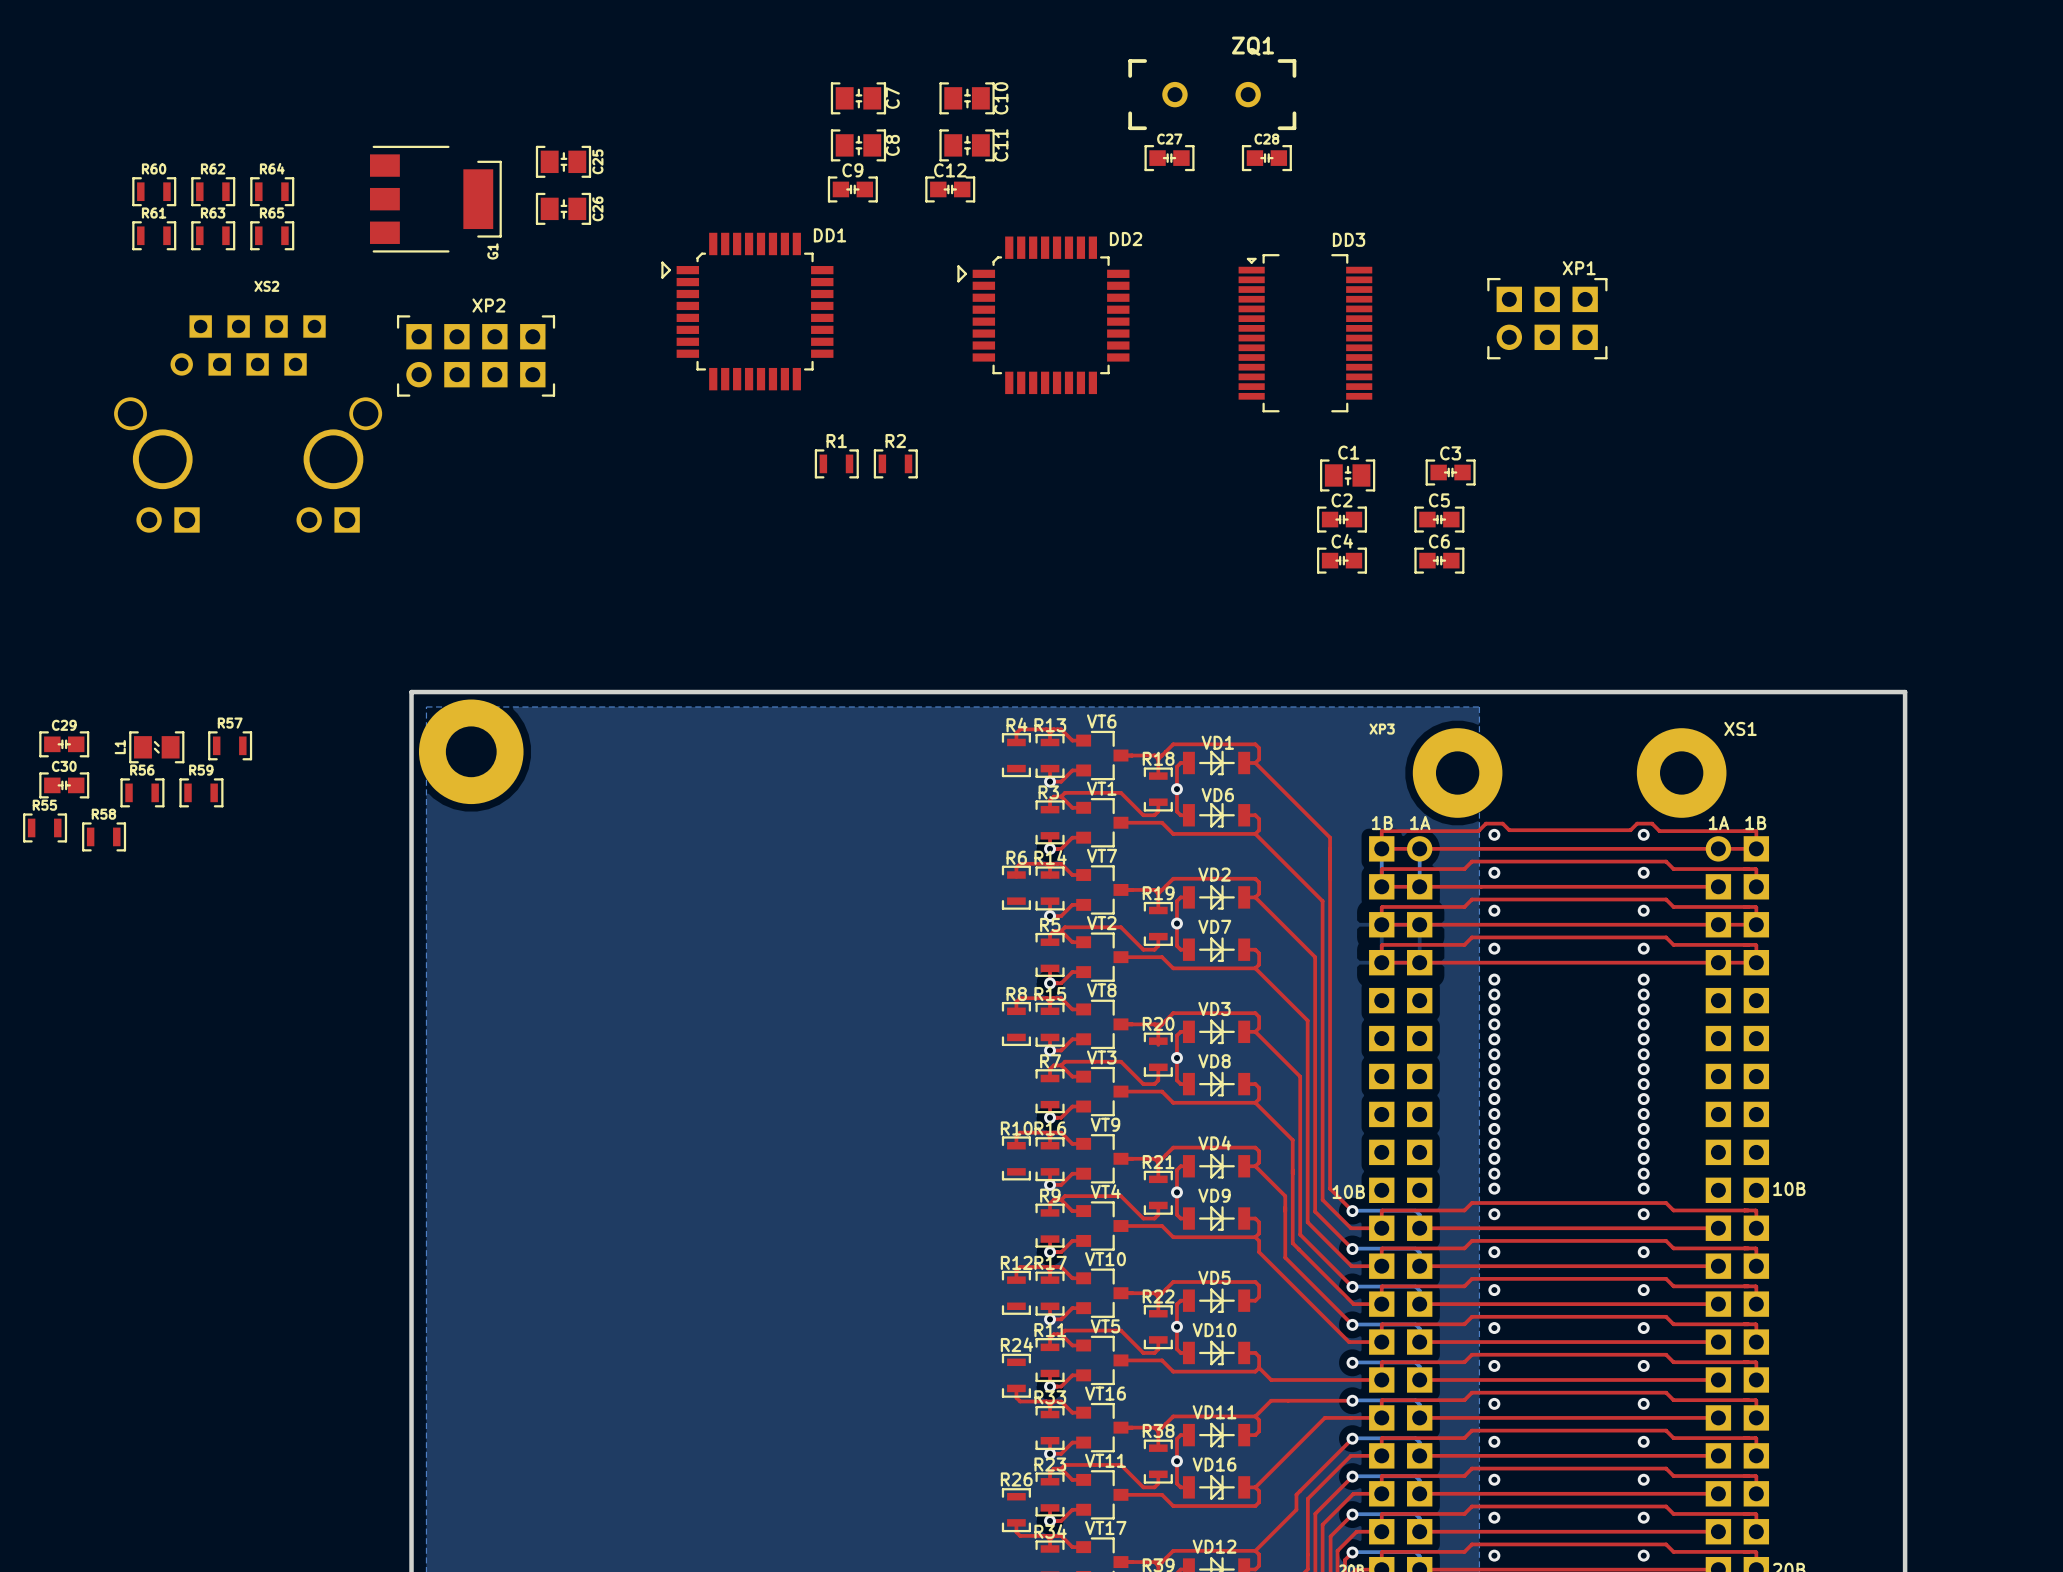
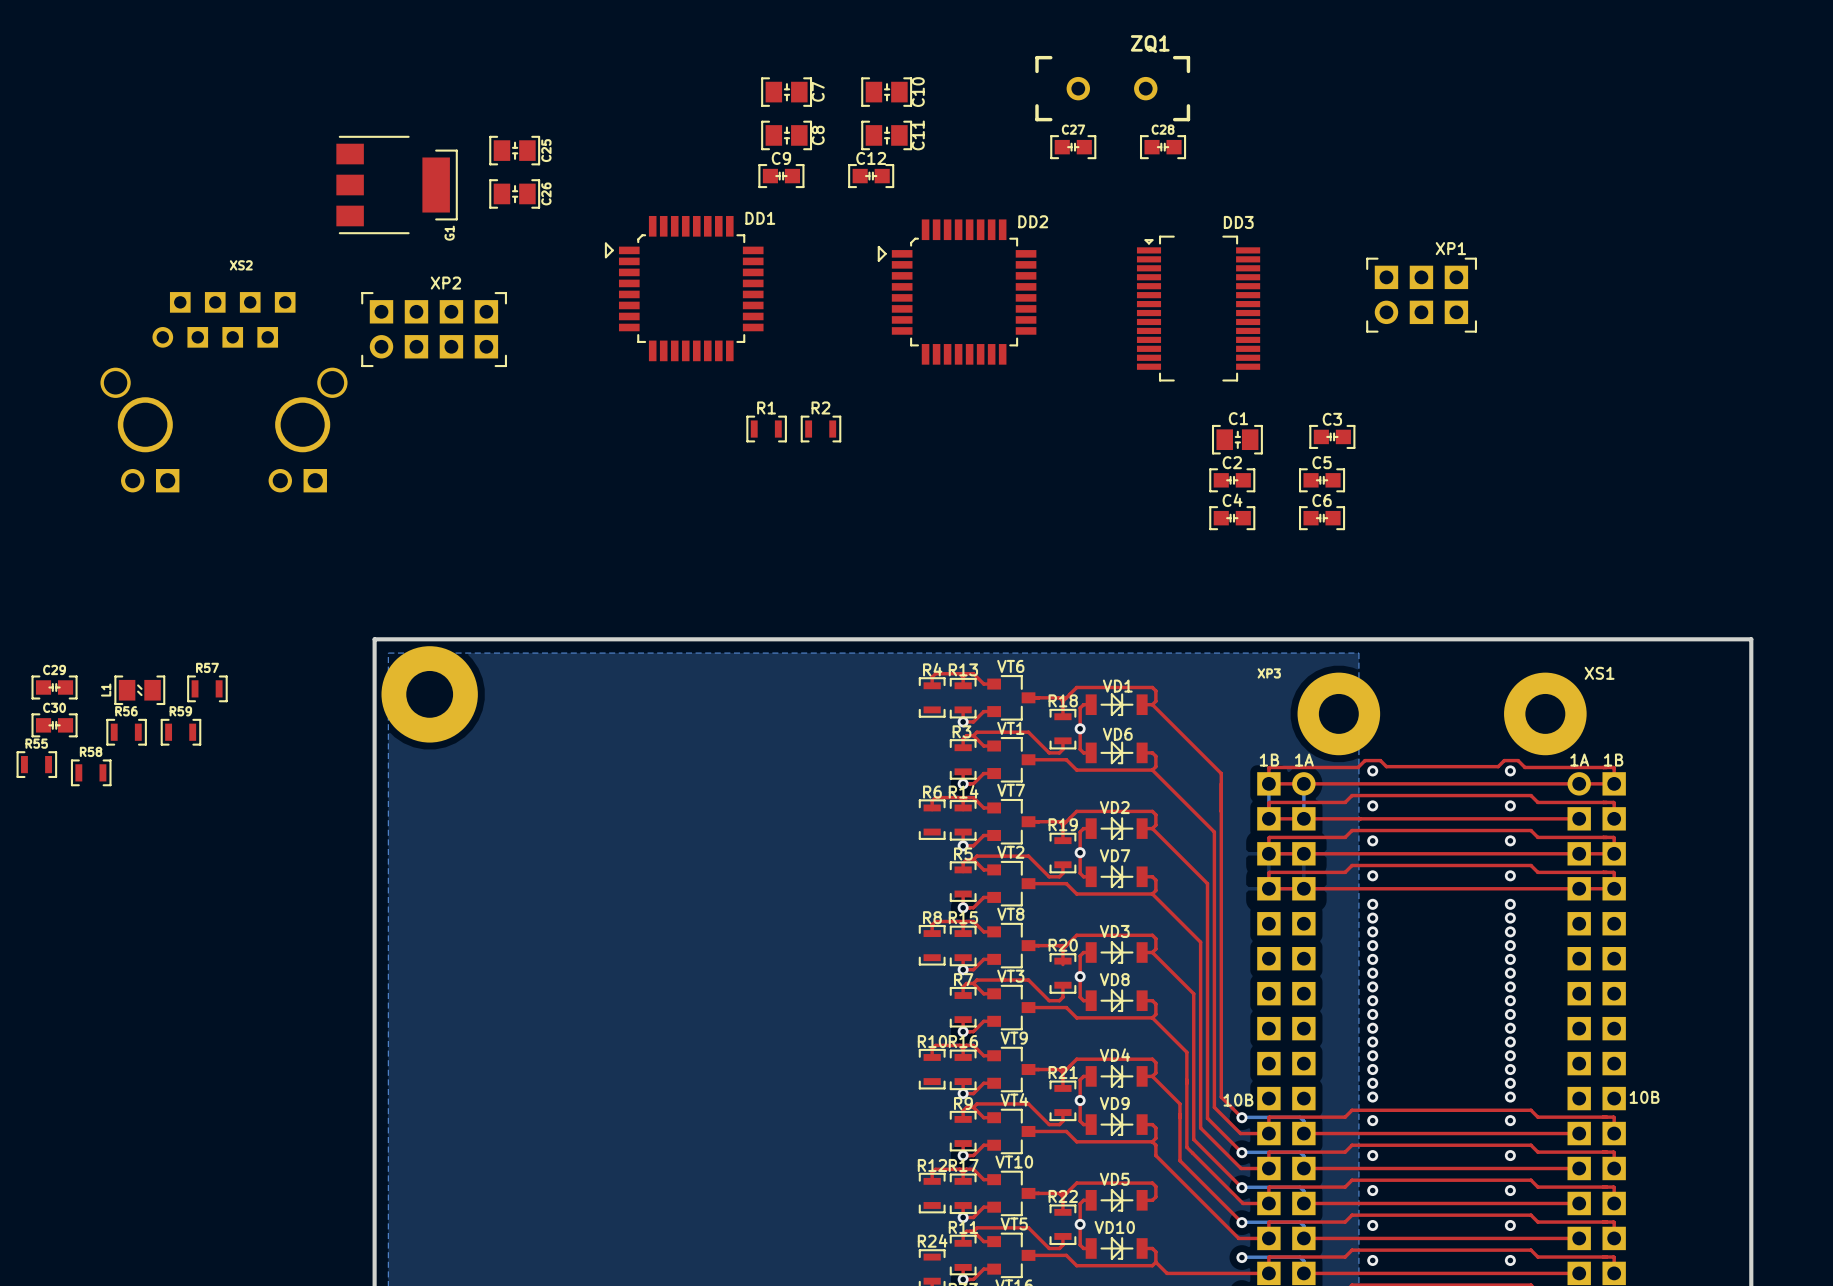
R60: (154, 191) -> none
R62: (213, 191) -> none
R64: (272, 191) -> none
R61: (154, 235) -> none
R63: (213, 235) -> none
R65: (272, 235) -> none

